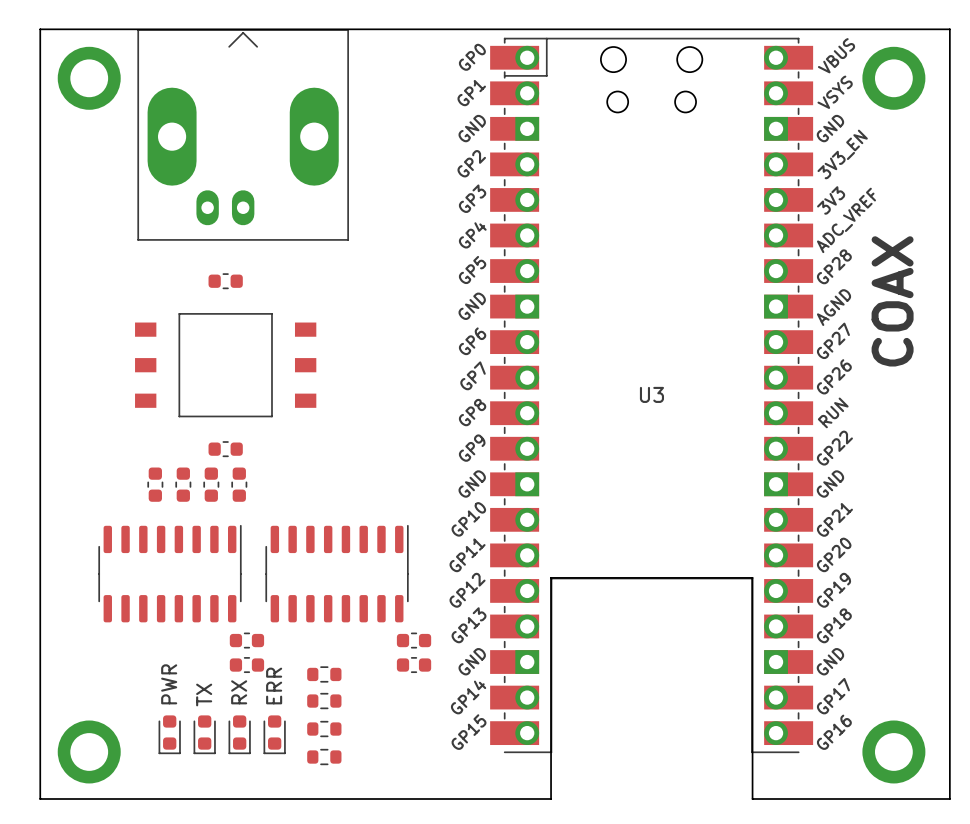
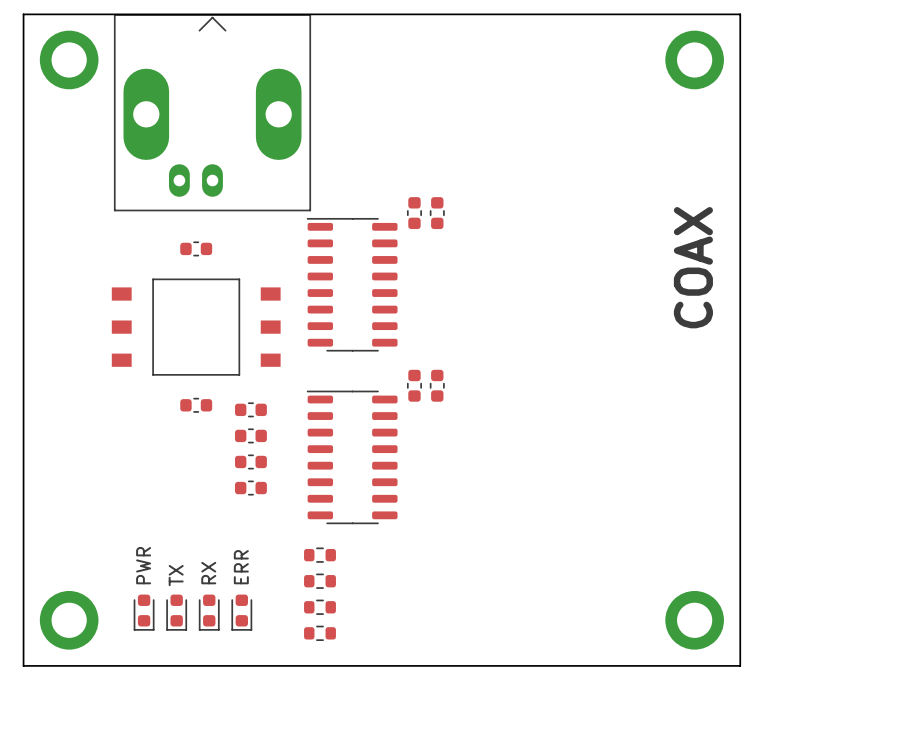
board edge: (809, 29) (949, 29) (949, 799) (752, 799) (752, 577) (551, 577) (551, 799) (40, 799) (40, 729) -> (740, 14) (740, 665) (23, 665)
part position: (893, 78) -> (694, 59)
part: none -> (414, 213)
part: none -> (437, 213)
text position: COAX (892, 301) -> COAX (693, 267)
part: none -> (352, 284)
U3: (651, 395) -> none
part: none -> (414, 385)
part: none -> (437, 385)
part: none -> (250, 409)
part: none -> (250, 435)
part: (155, 484) -> none
part: (183, 484) -> none
part: (211, 484) -> none
part: (239, 484) -> none
part: none -> (250, 461)
part: none -> (250, 488)
part: (169, 573) -> none
part rotation: 0° (337, 573) -> 90° counterclockwise (352, 457)
part position: (337, 573) -> (352, 457)
part: none -> (320, 555)
part: none -> (320, 581)
part: (246, 640) -> none
part: (414, 640) -> none
part footprint: [229, 657, 265, 674] -> [198, 594, 220, 631]
part: (414, 665) -> none
part: none -> (320, 607)
part: none -> (144, 612)
part: none -> (176, 612)
part: none -> (241, 612)
part: (324, 674) -> none
text position: PWR (169, 684) -> PWR (143, 565)
text position: ERR (274, 686) -> ERR (241, 567)
text position: RX (239, 692) -> RX (208, 573)
text position: TX (204, 694) -> TX (176, 575)
part: none -> (320, 633)
part: (324, 701) -> none
part: (324, 729) -> none
part: (169, 734) -> none
part: (204, 734) -> none
part: (239, 734) -> none
part: (274, 734) -> none
part position: (89, 751) -> (69, 620)
part position: (893, 751) -> (694, 620)
part: (324, 757) -> none

